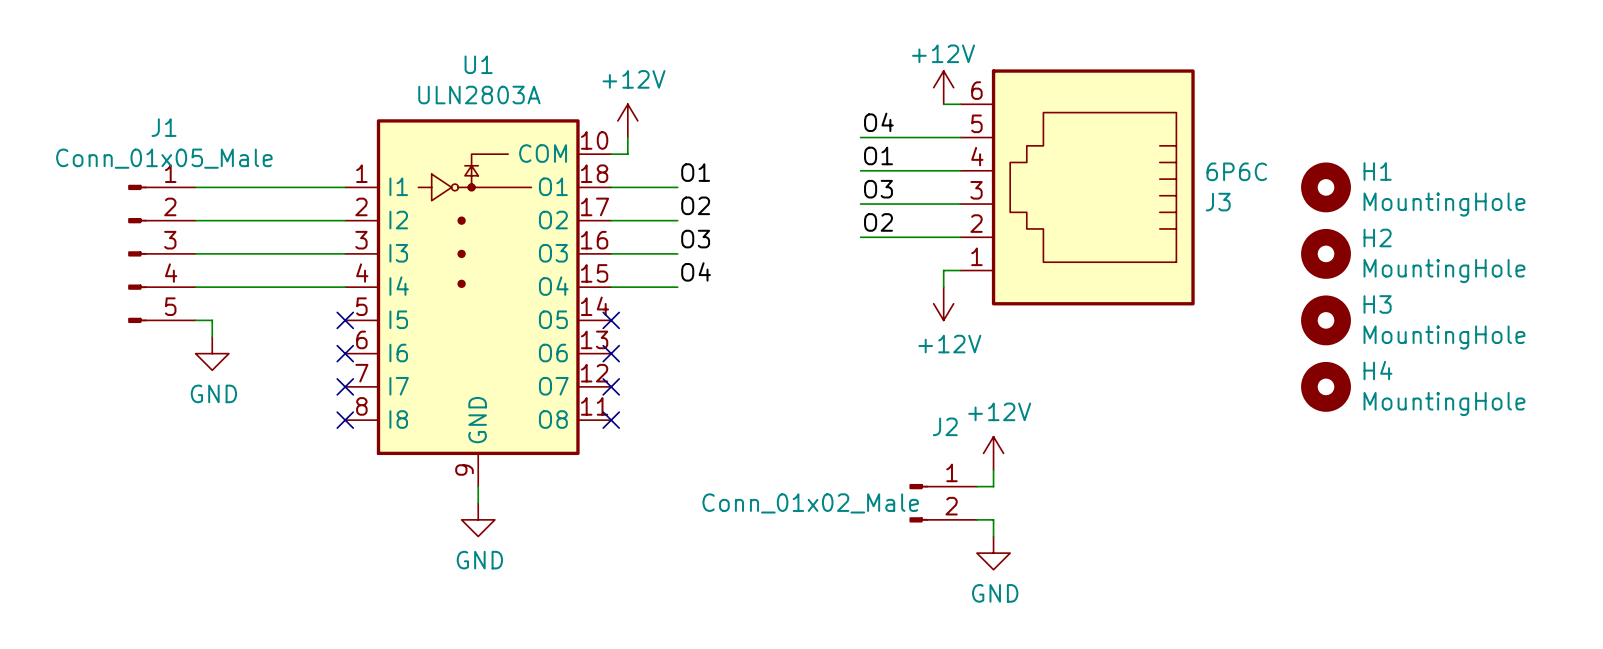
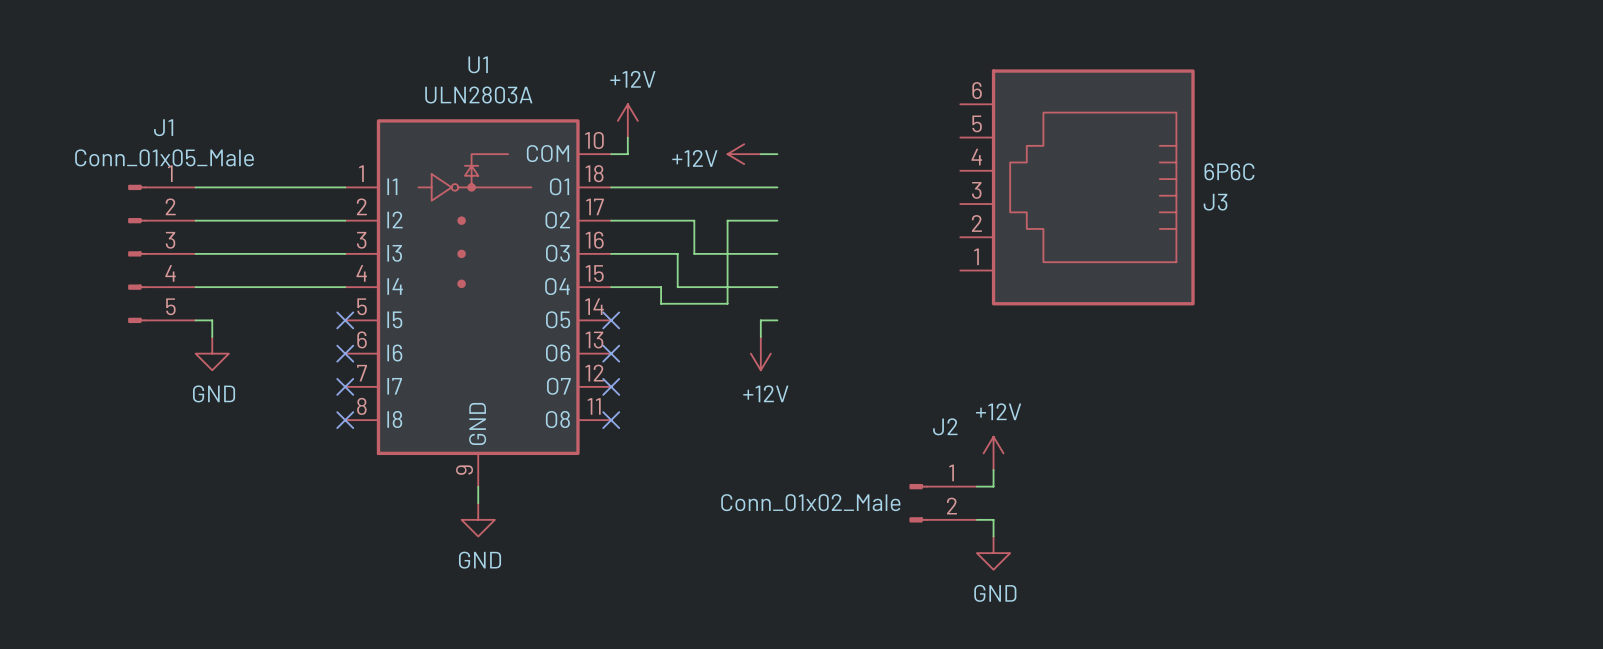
power symbol: +12V (943, 87) -> none
wire: (943, 104) (960, 104) -> (760, 154) (777, 154)
label: O4 (878, 122) -> none
wire: (860, 137) (960, 137) -> (677, 187) (777, 187)
power symbol: none -> +12V (744, 154)
label: O1 (878, 155) -> none
wire: (860, 170) (960, 170) -> none
label: O1 (695, 172) -> none
H1: MountingHole (1326, 187) -> none
label: O3 (878, 189) -> none
wire: (860, 204) (960, 204) -> none
label: O2 (695, 205) -> none
wire: none -> (677, 220) (694, 220) (694, 253) (777, 253)
label: O2 (878, 222) -> none
wire: (860, 237) (960, 237) -> none
label: O3 (695, 239) -> none
wire: none -> (677, 253) (677, 287) (777, 287)
H2: MountingHole (1326, 253) -> none
wire: (960, 270) (943, 270) (943, 287) -> (777, 320) (760, 320) (760, 337)
label: O4 (696, 271) -> none
wire: (661, 287) (677, 287) -> (661, 287) (661, 303) (727, 303) (727, 220) (777, 220)
power symbol: +12V (943, 303) -> none
H3: MountingHole (1326, 320) -> none
power symbol: none -> +12V (760, 353)
H4: MountingHole (1326, 386) -> none

